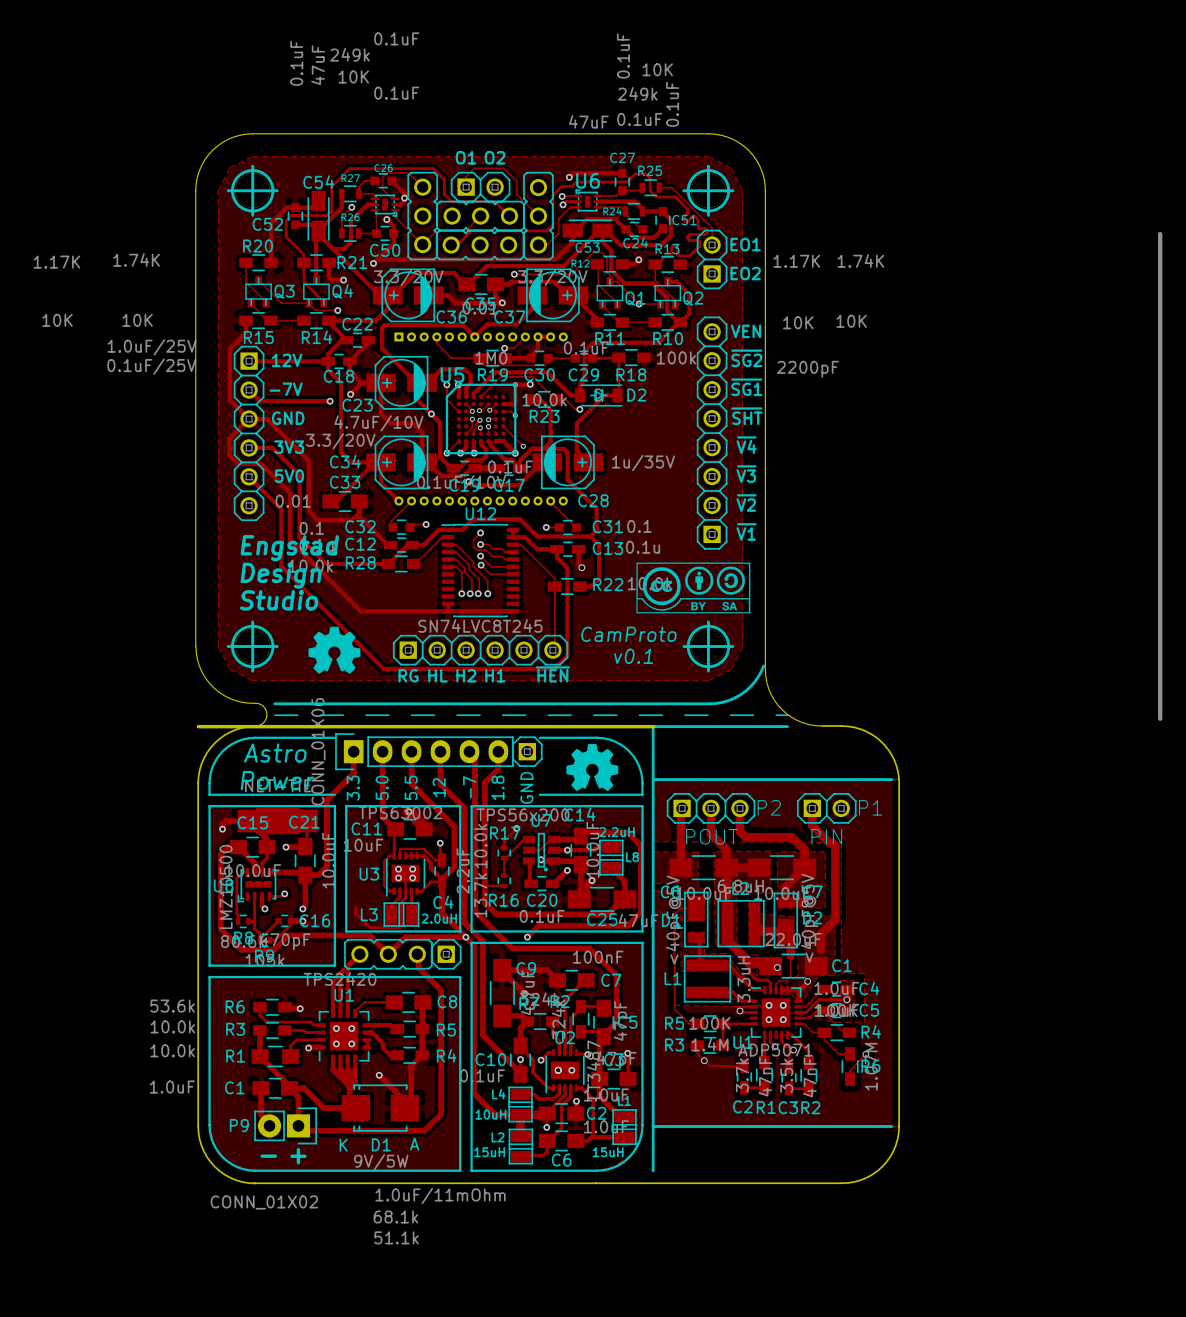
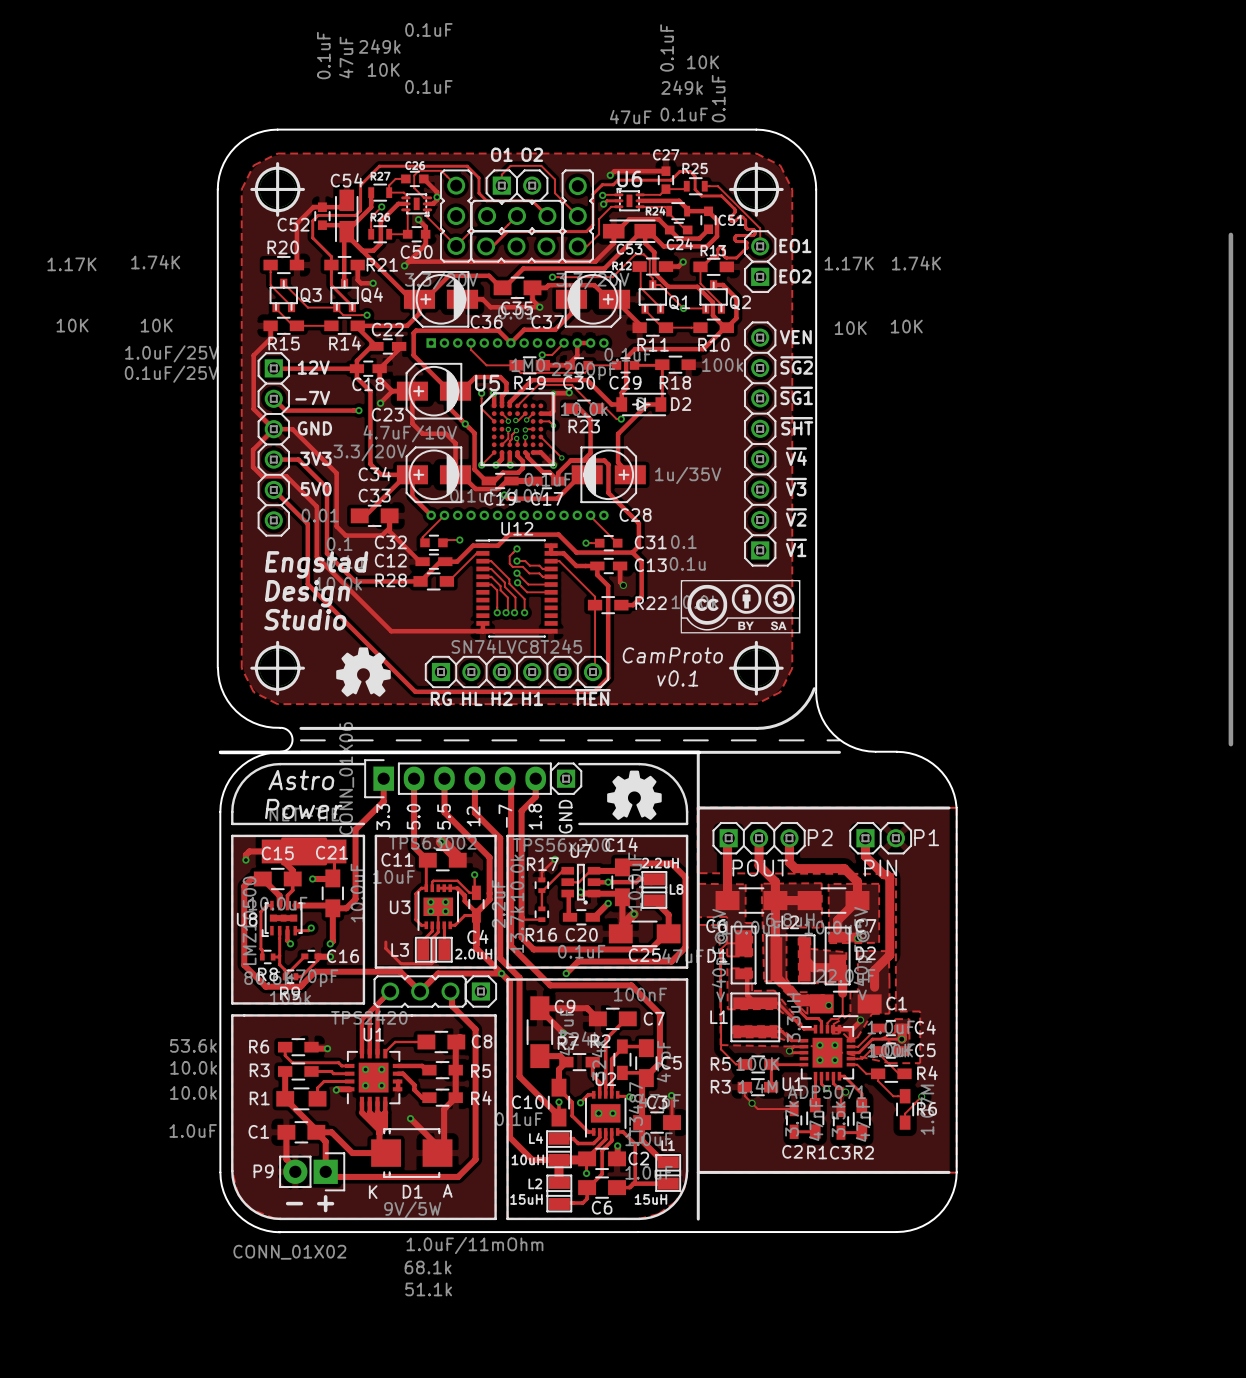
C30 value position: 2200pF (807, 369) -> 2200pF (584, 371)

